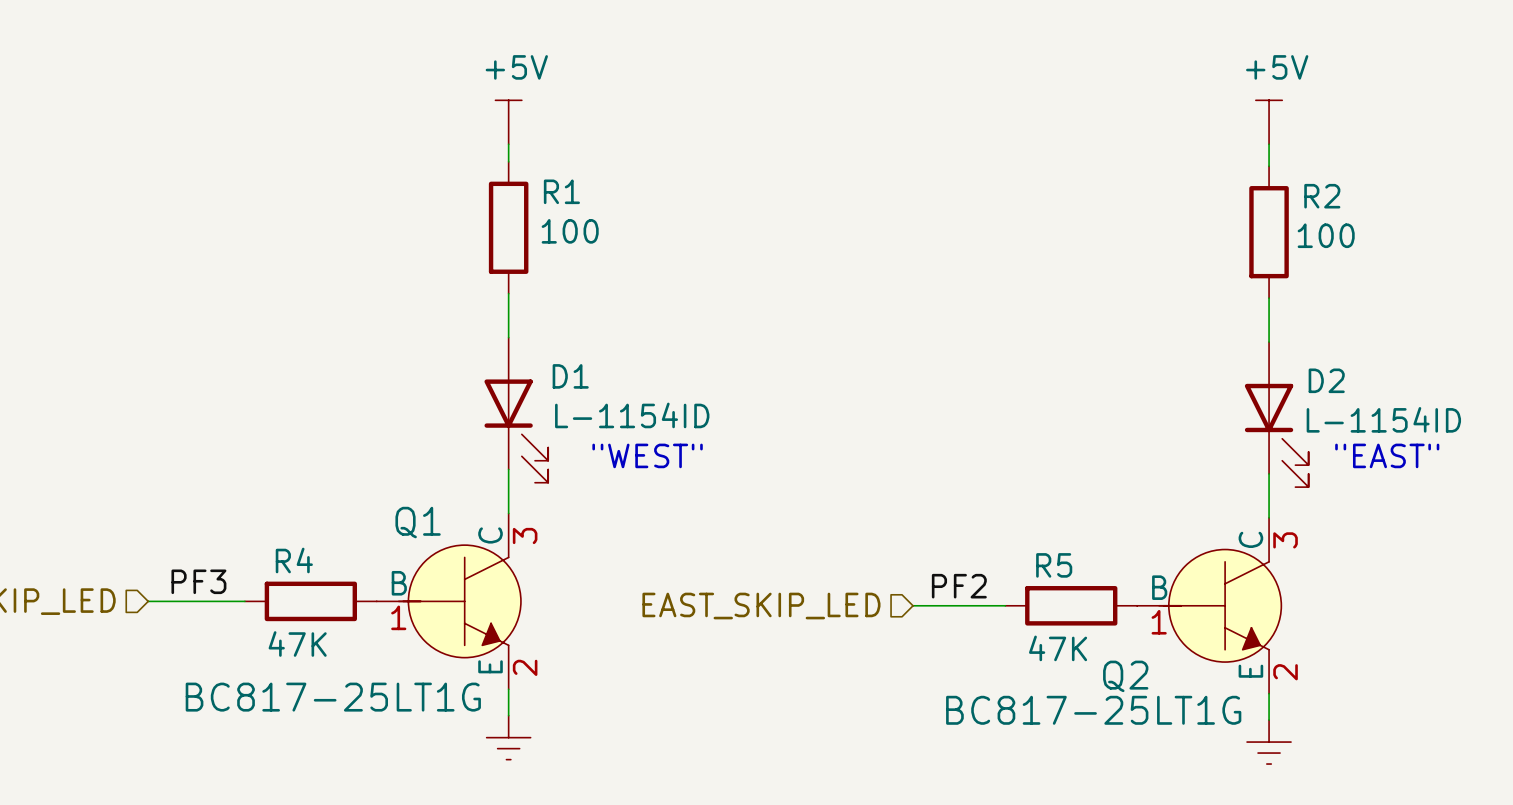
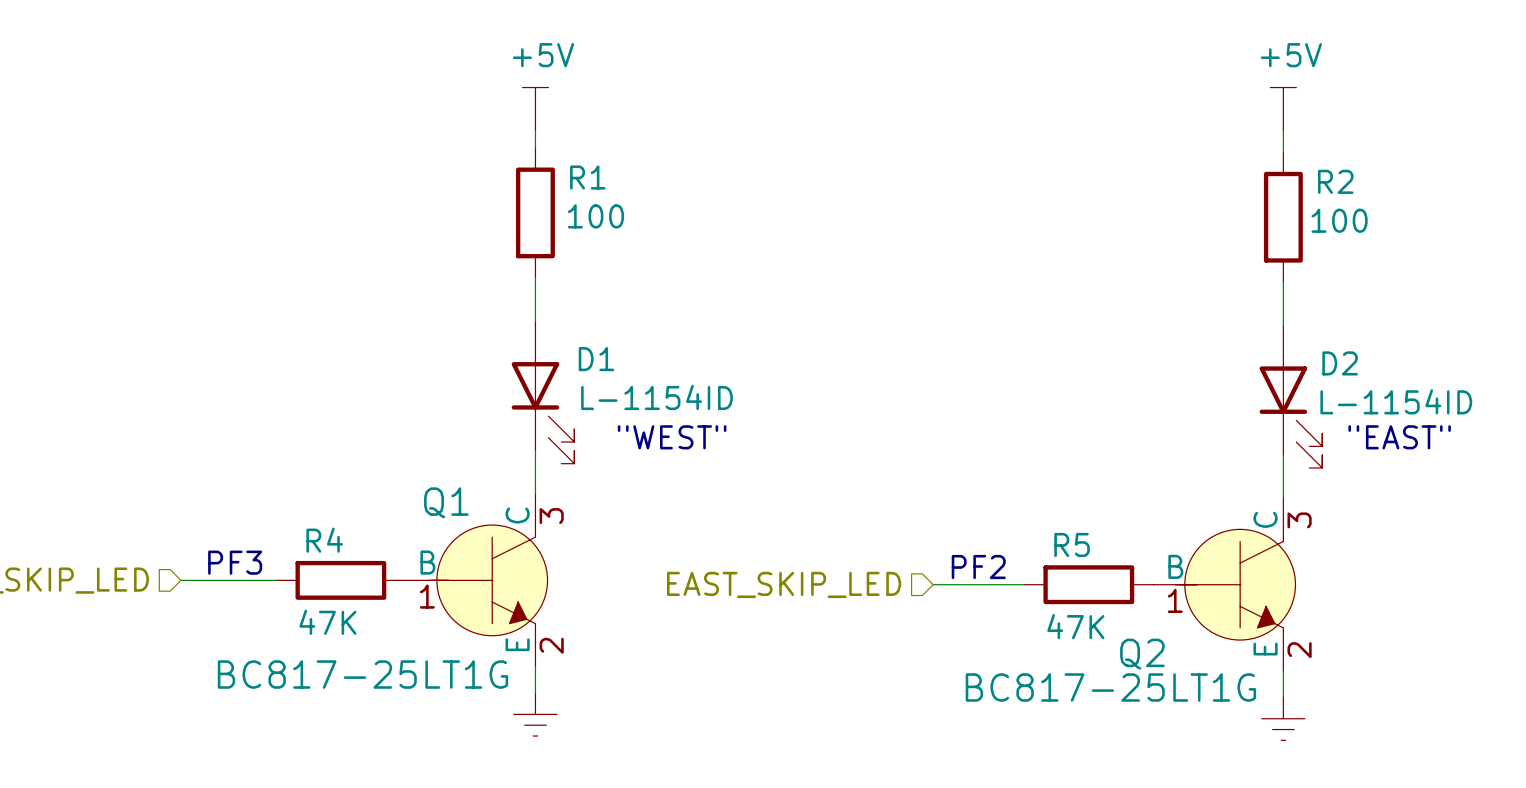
label: PF3 (198, 581) -> none
text: none -> PF3 (235, 562)
label: PF2 (959, 586) -> none
text: none -> PF2 (978, 567)

